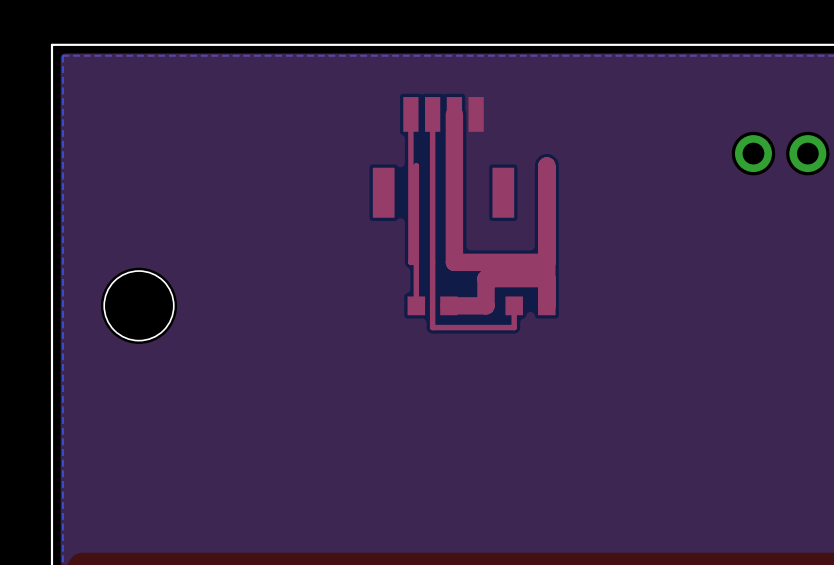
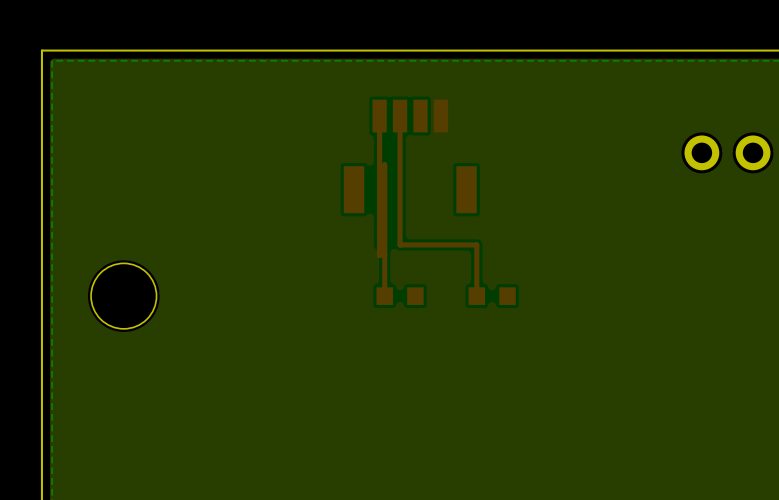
top track: (454, 114) (454, 262) (546, 262) -> none
top track: (546, 165) (546, 305) -> none
top track: (432, 251) (432, 327) (514, 327) (514, 305) -> (400, 244) (476, 244) (476, 296)
top track: (546, 278) (485, 278) (485, 305) (448, 305) -> none

